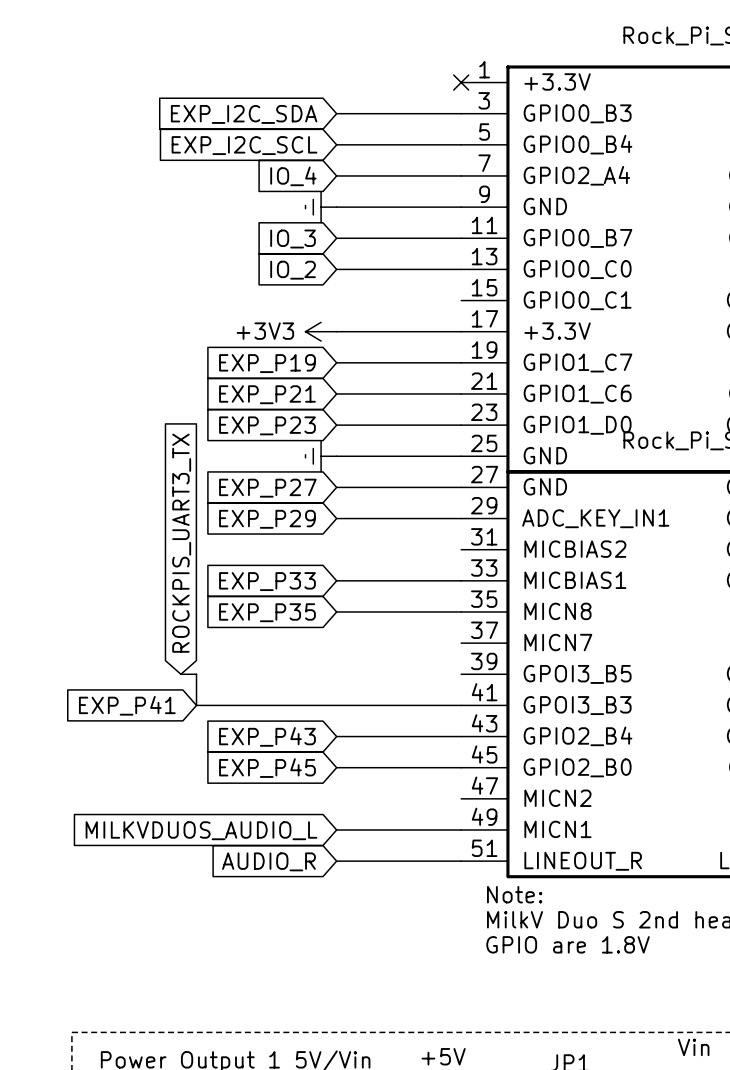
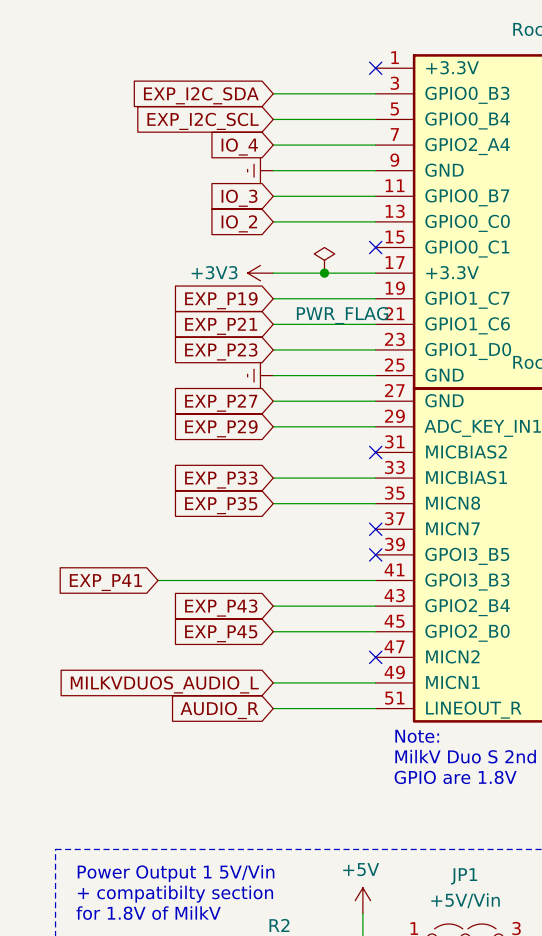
no-connect mark: none -> (375, 247)
power symbol: none -> PWR_FLAG (324, 260)
junction: none -> (324, 273)
global label: ROCKPIS_UART3_TX (181, 543) -> none
no-connect mark: none -> (375, 452)
no-connect mark: none -> (375, 529)
wire: (180, 674) (196, 674) (196, 705) -> none
no-connect mark: none -> (375, 554)
no-connect mark: none -> (375, 657)

